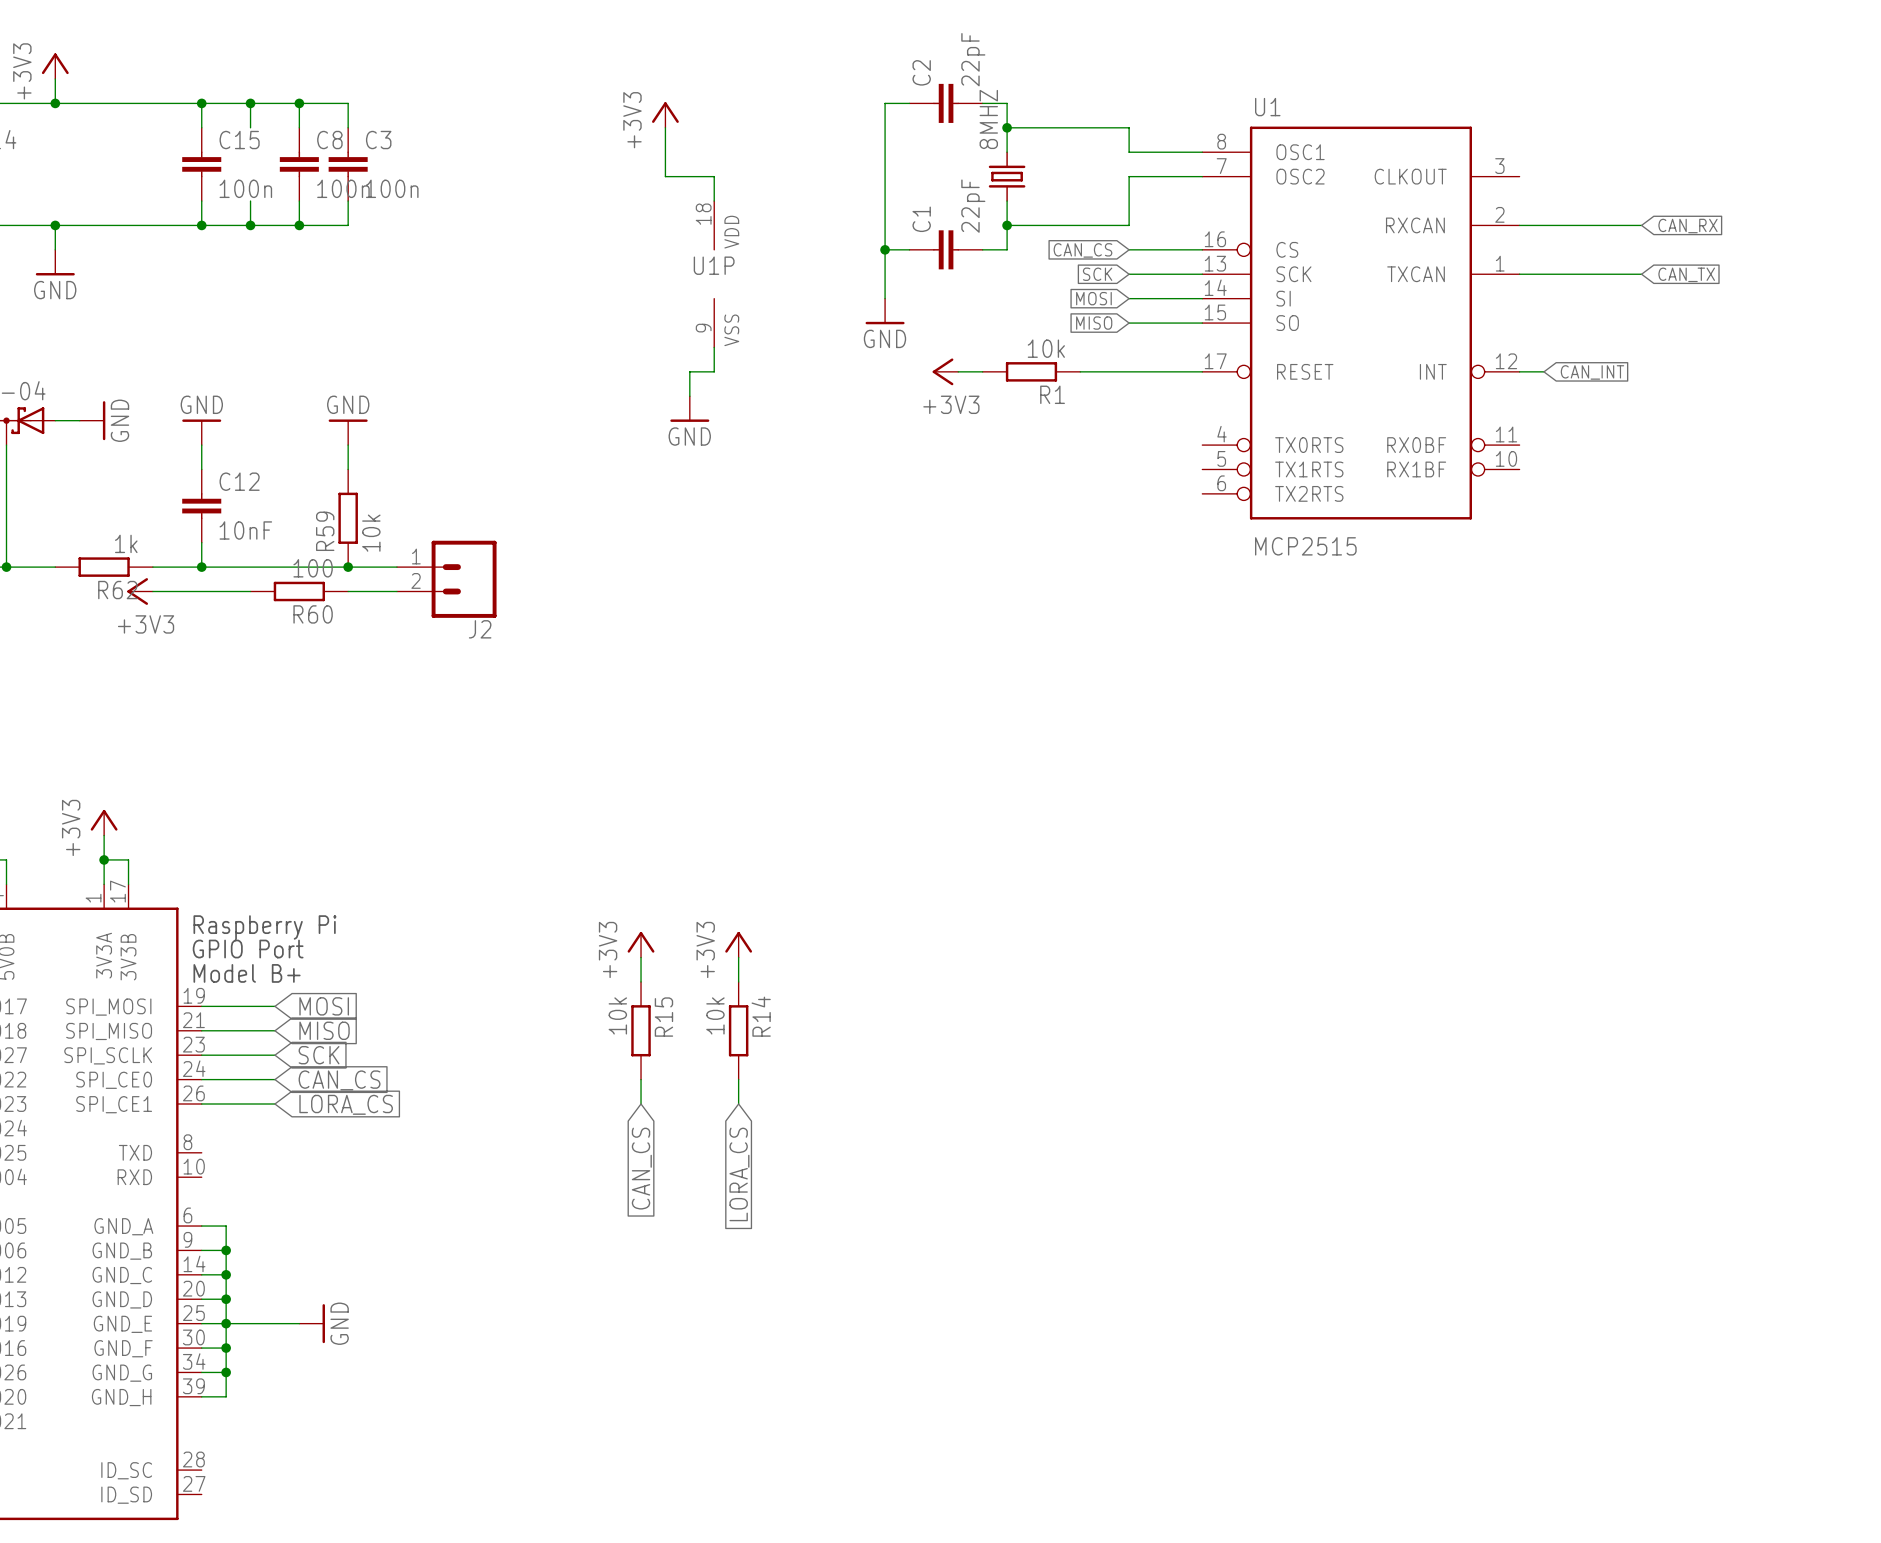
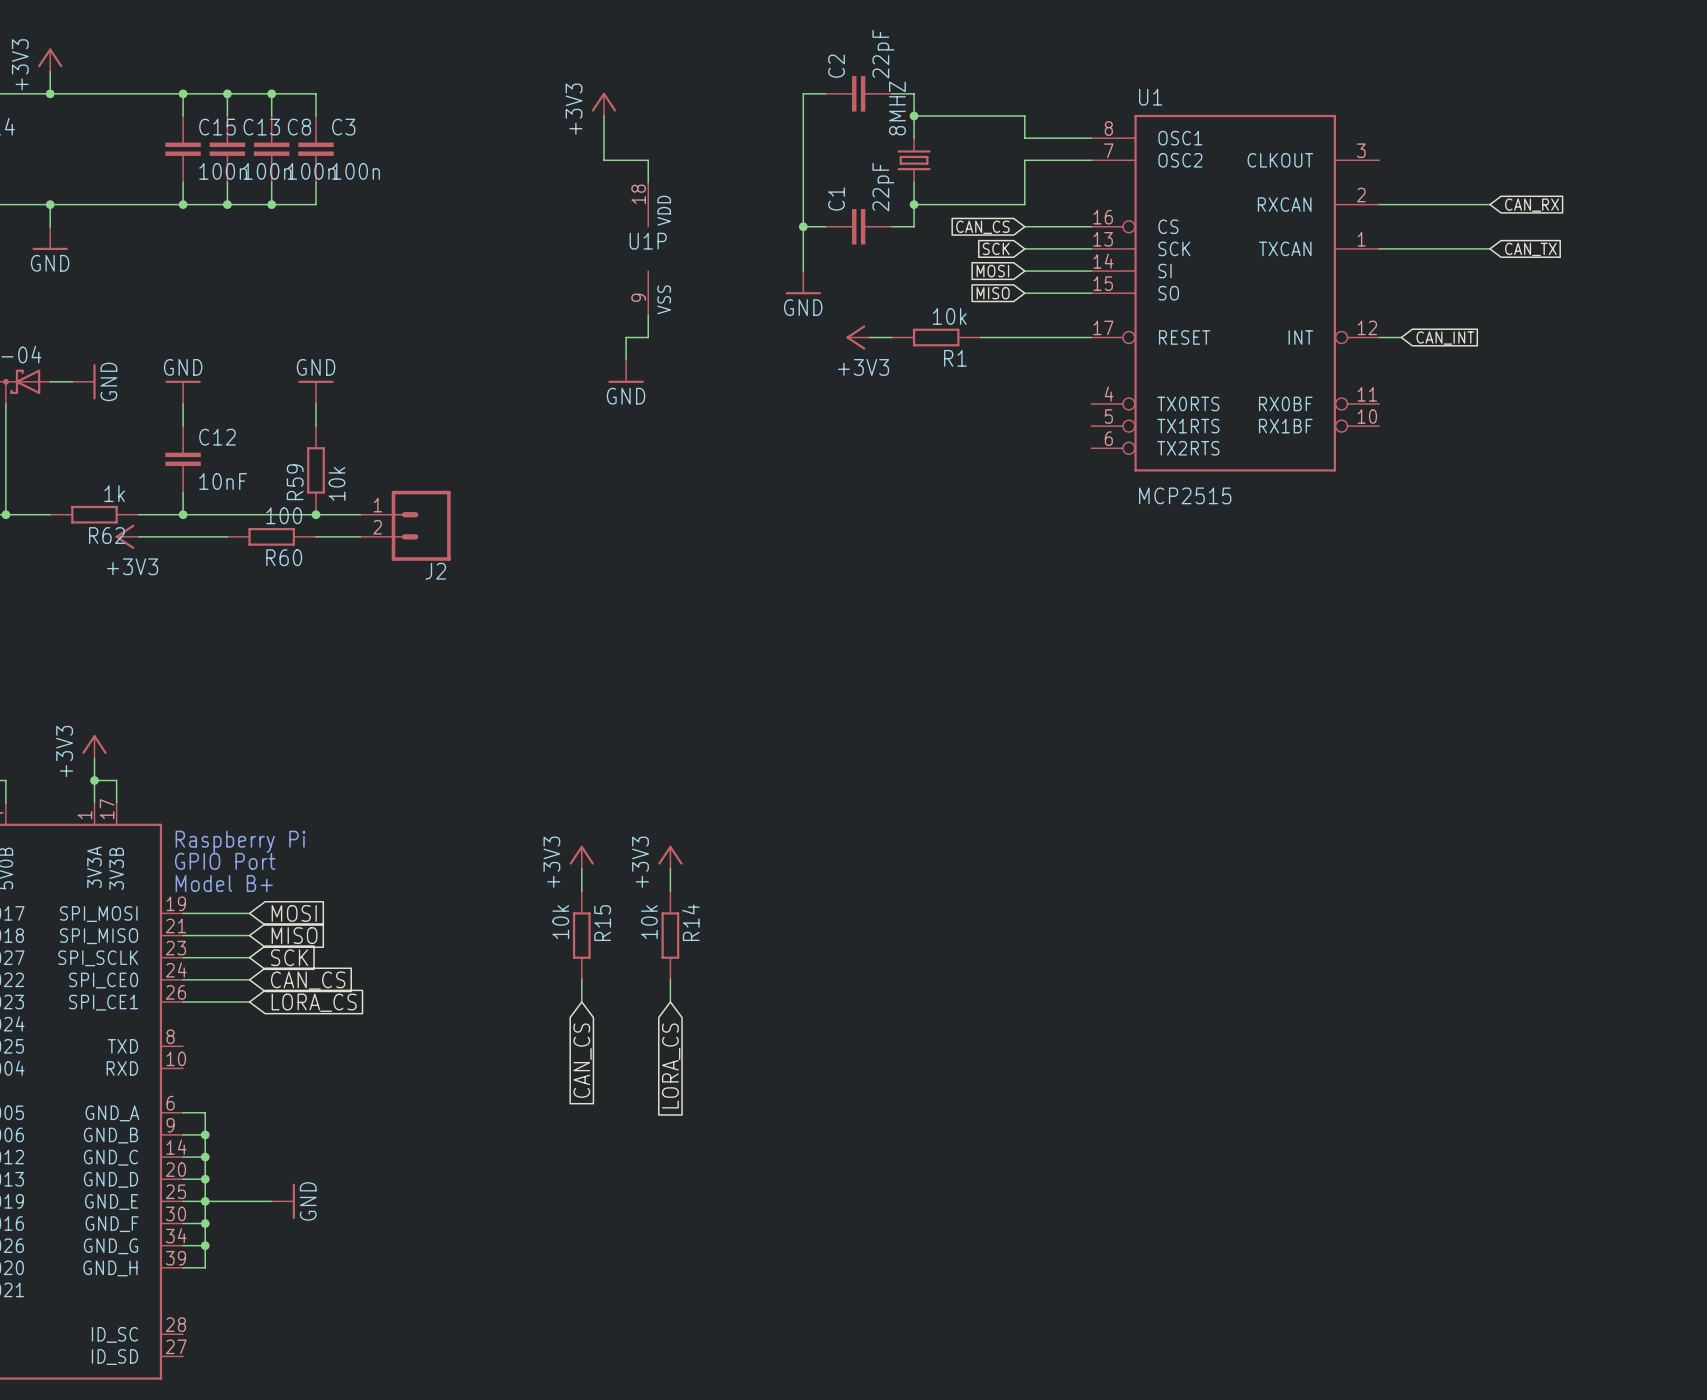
C13: none -> 100n (227, 149)

